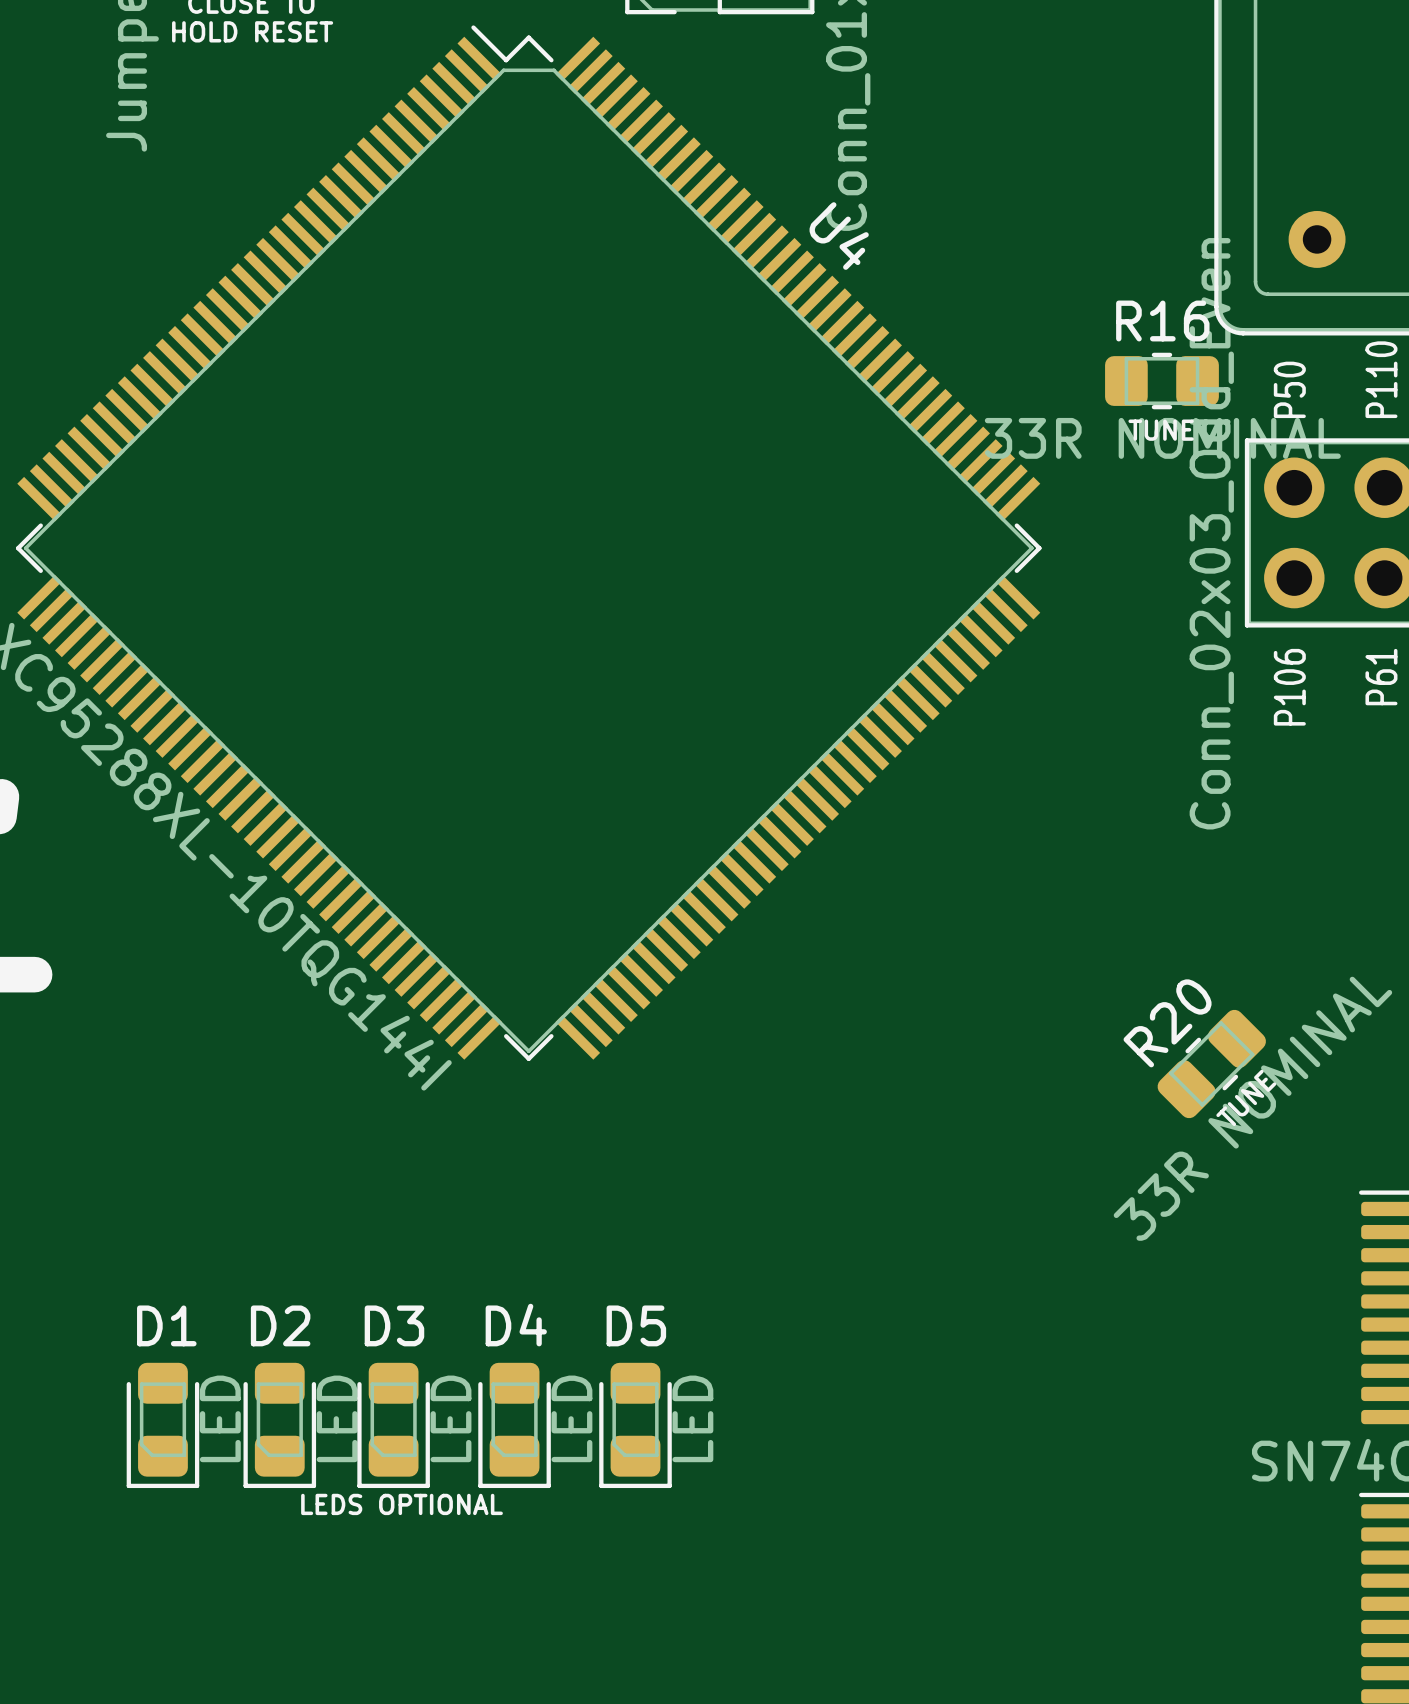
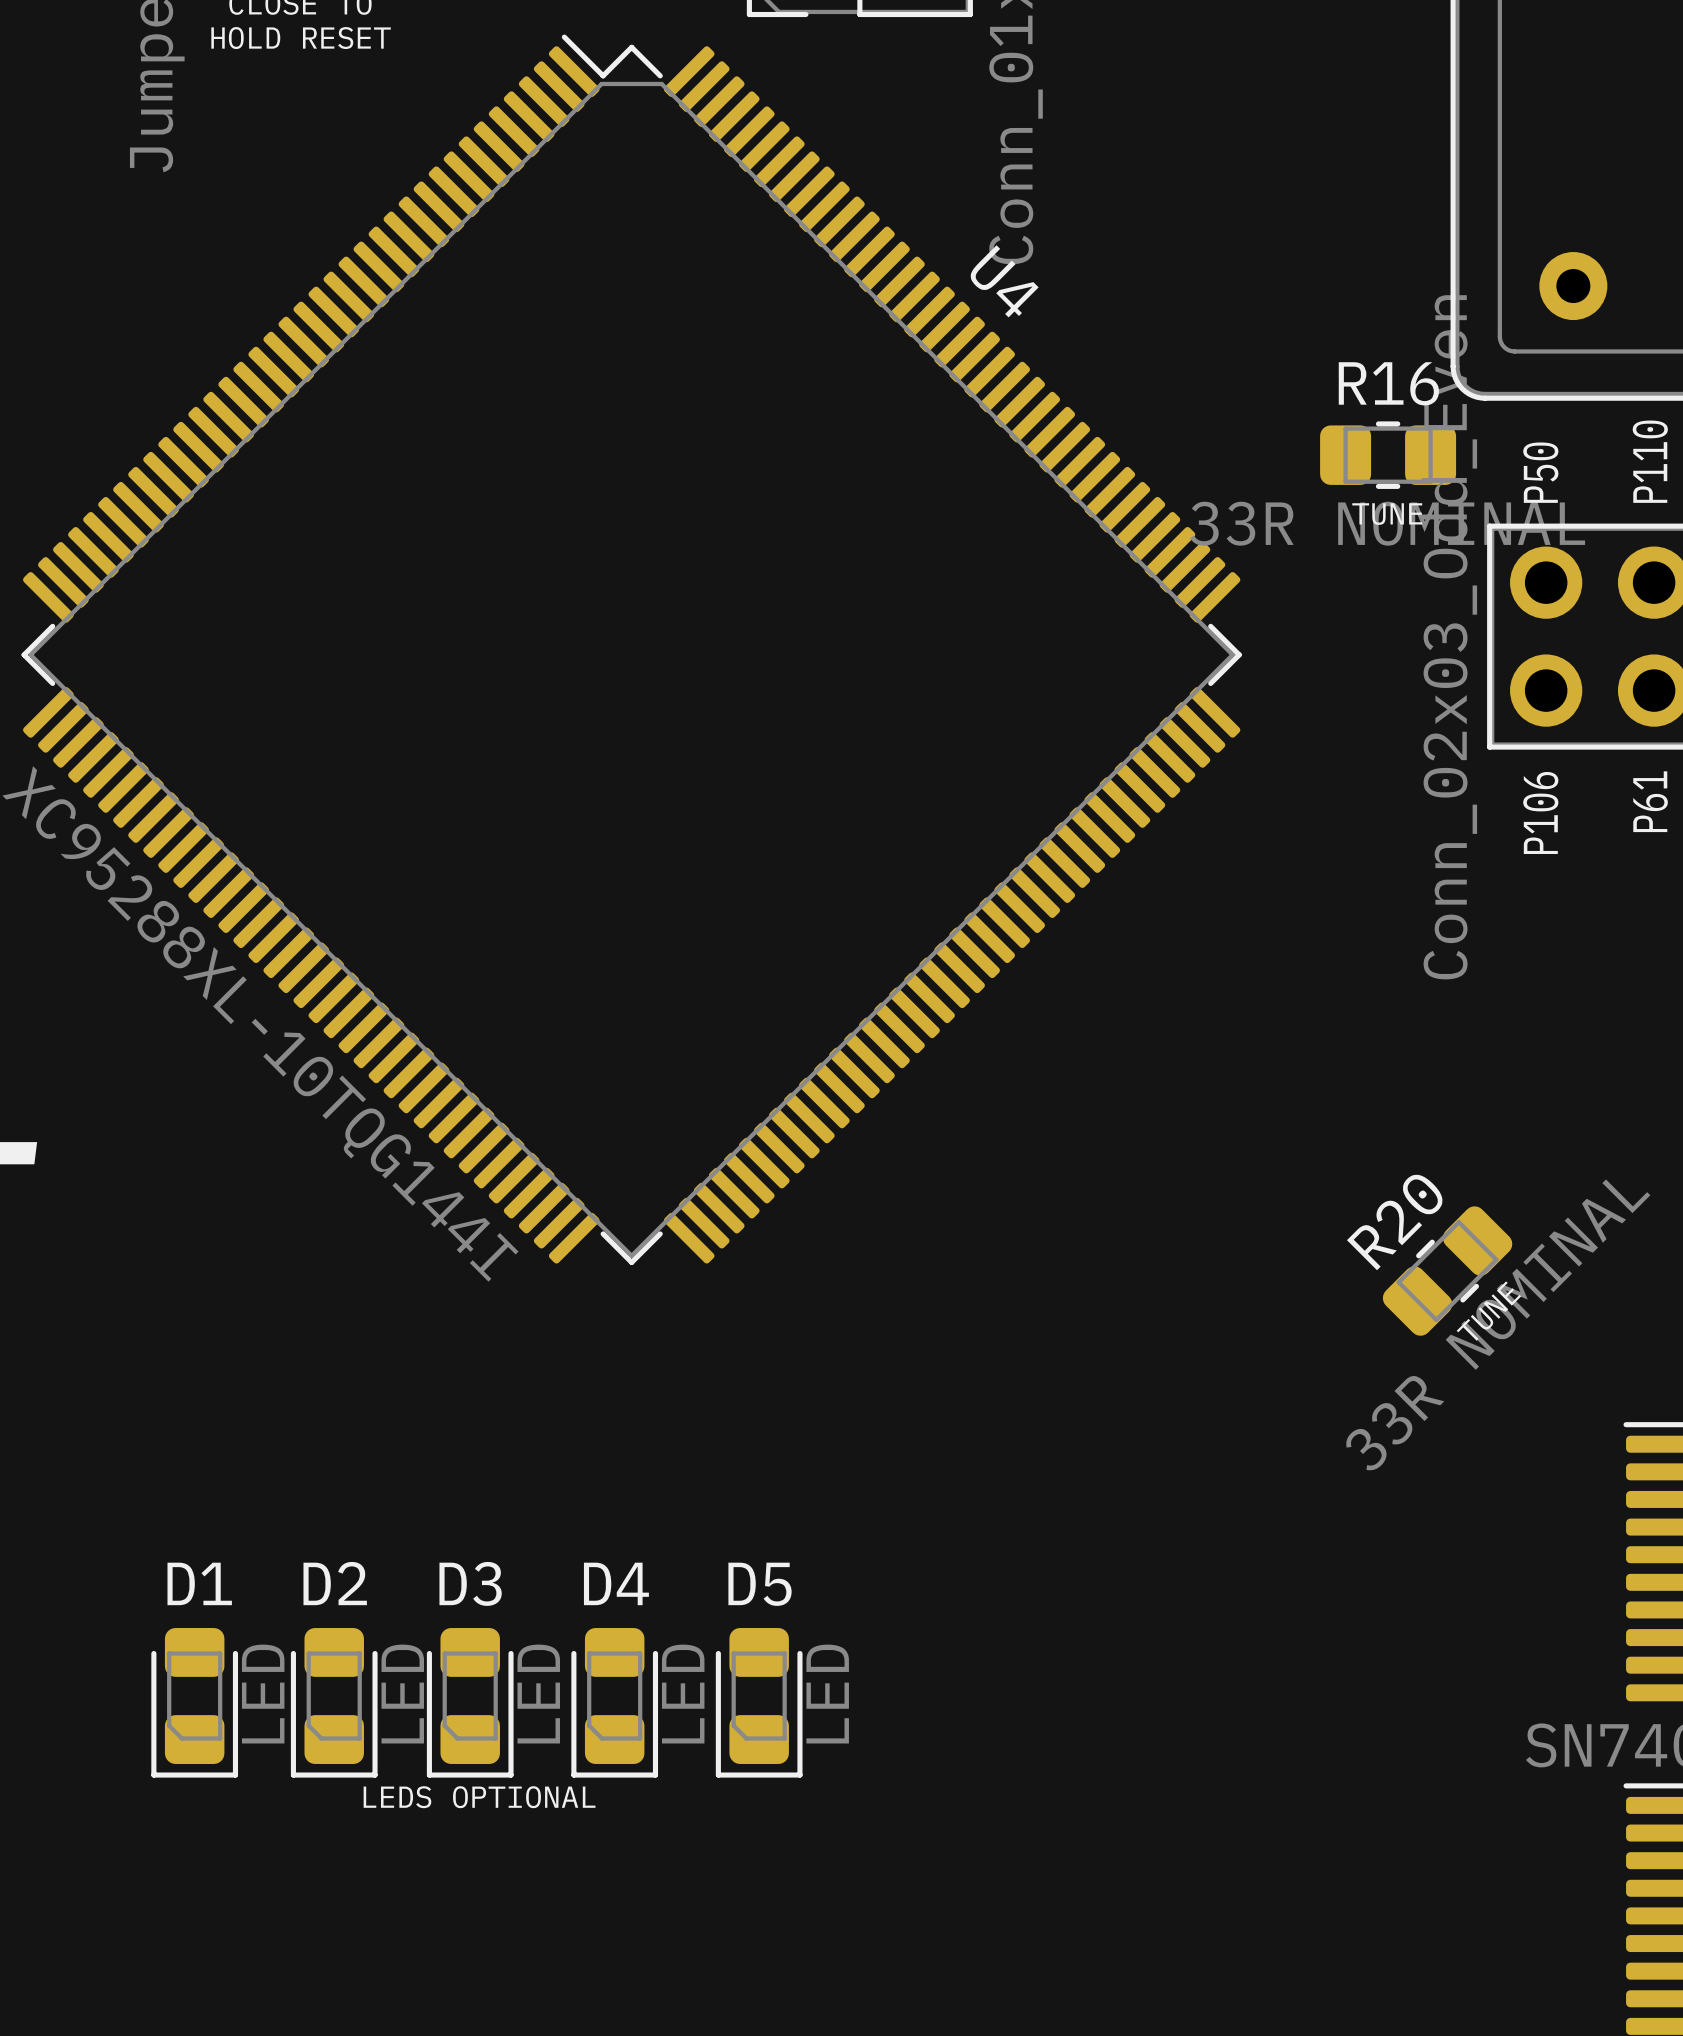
U4 footprint: [16, 25, 1042, 1061] -> [21, 34, 1242, 1266]

